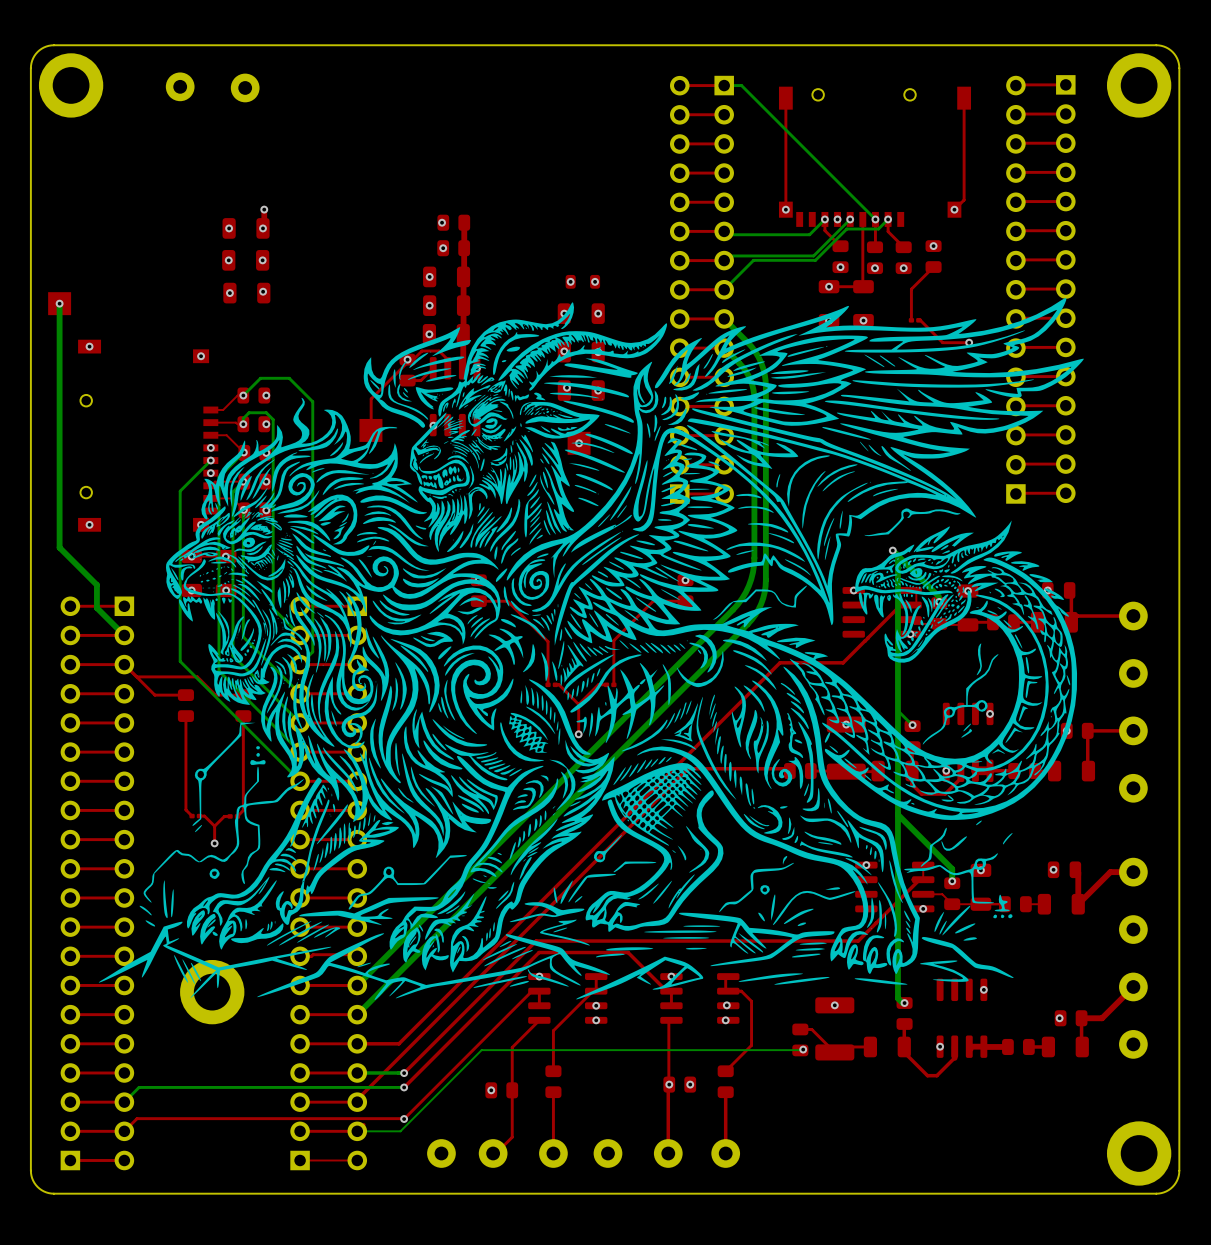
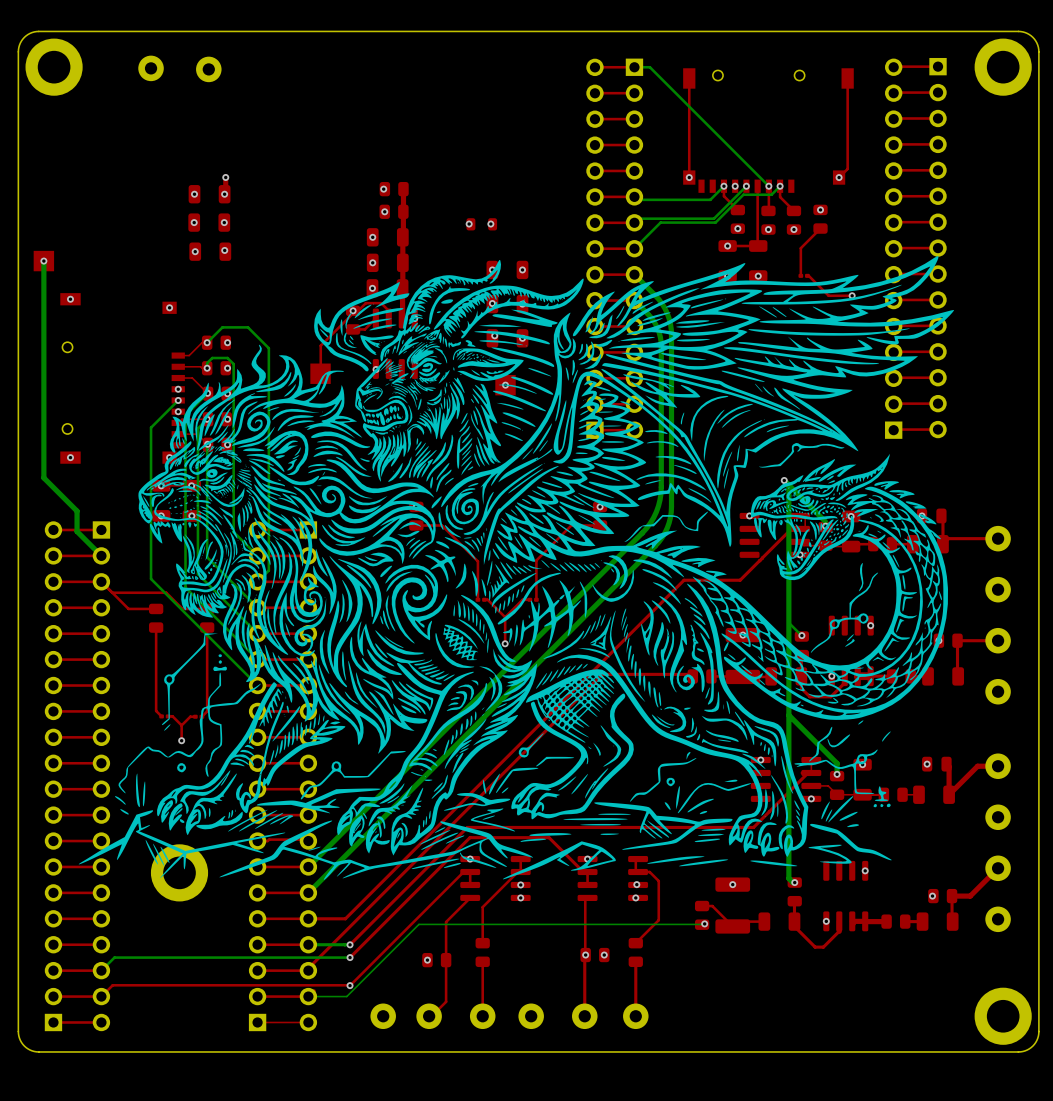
via: none -> (469, 224)
via: none -> (490, 224)
via: (570, 281) -> none
part position: (582, 281) -> (481, 224)
via: (595, 281) -> none

